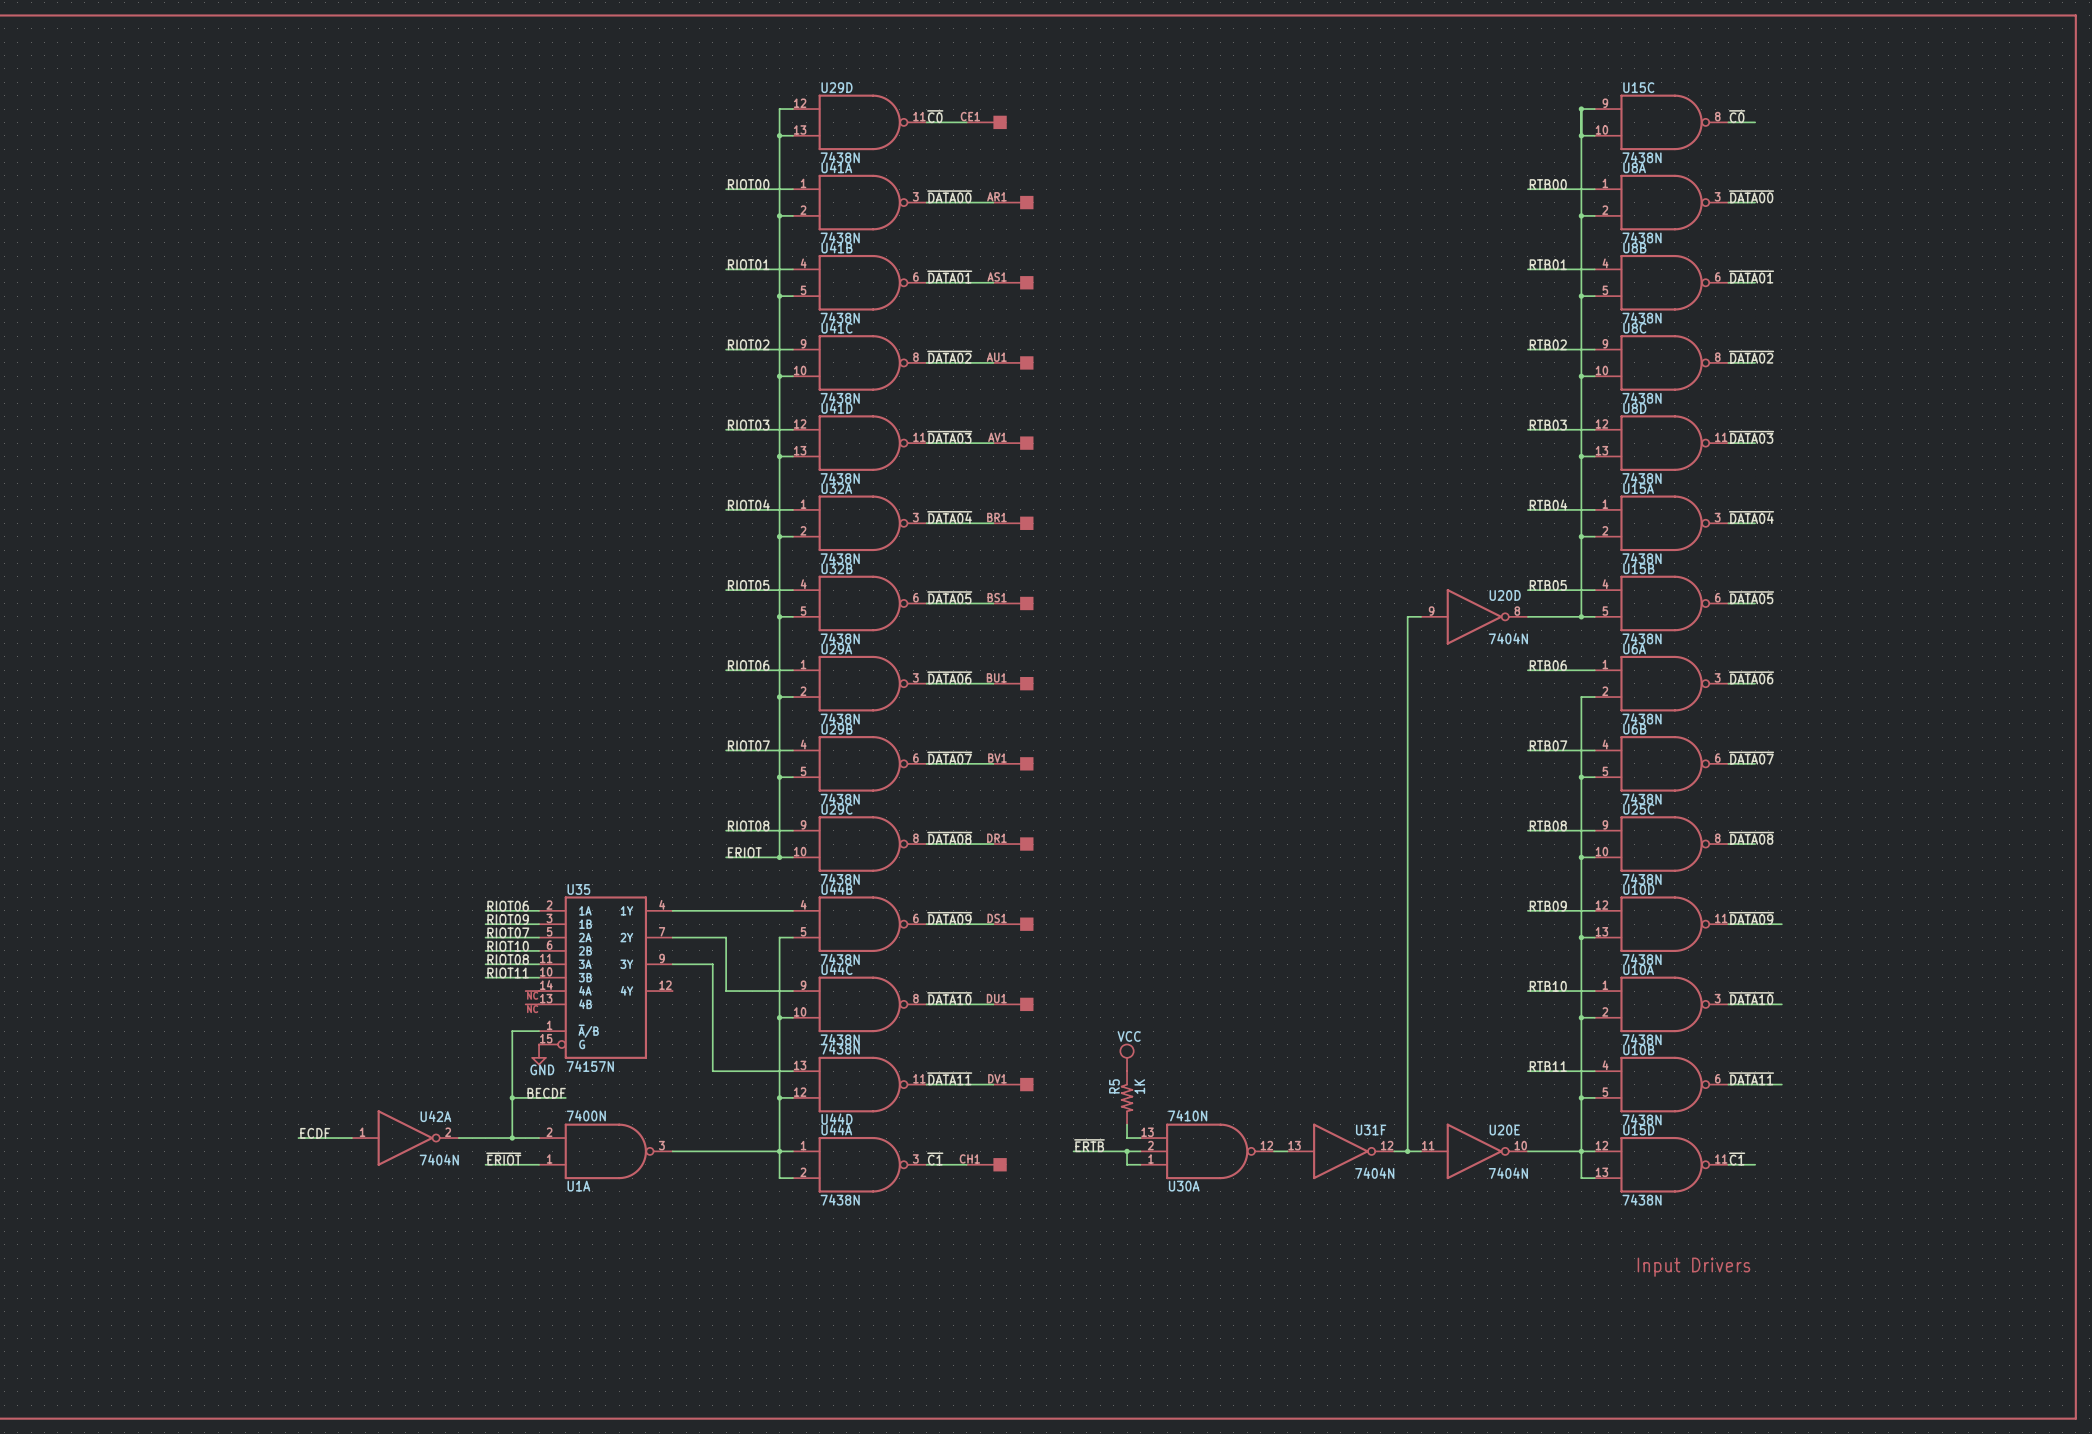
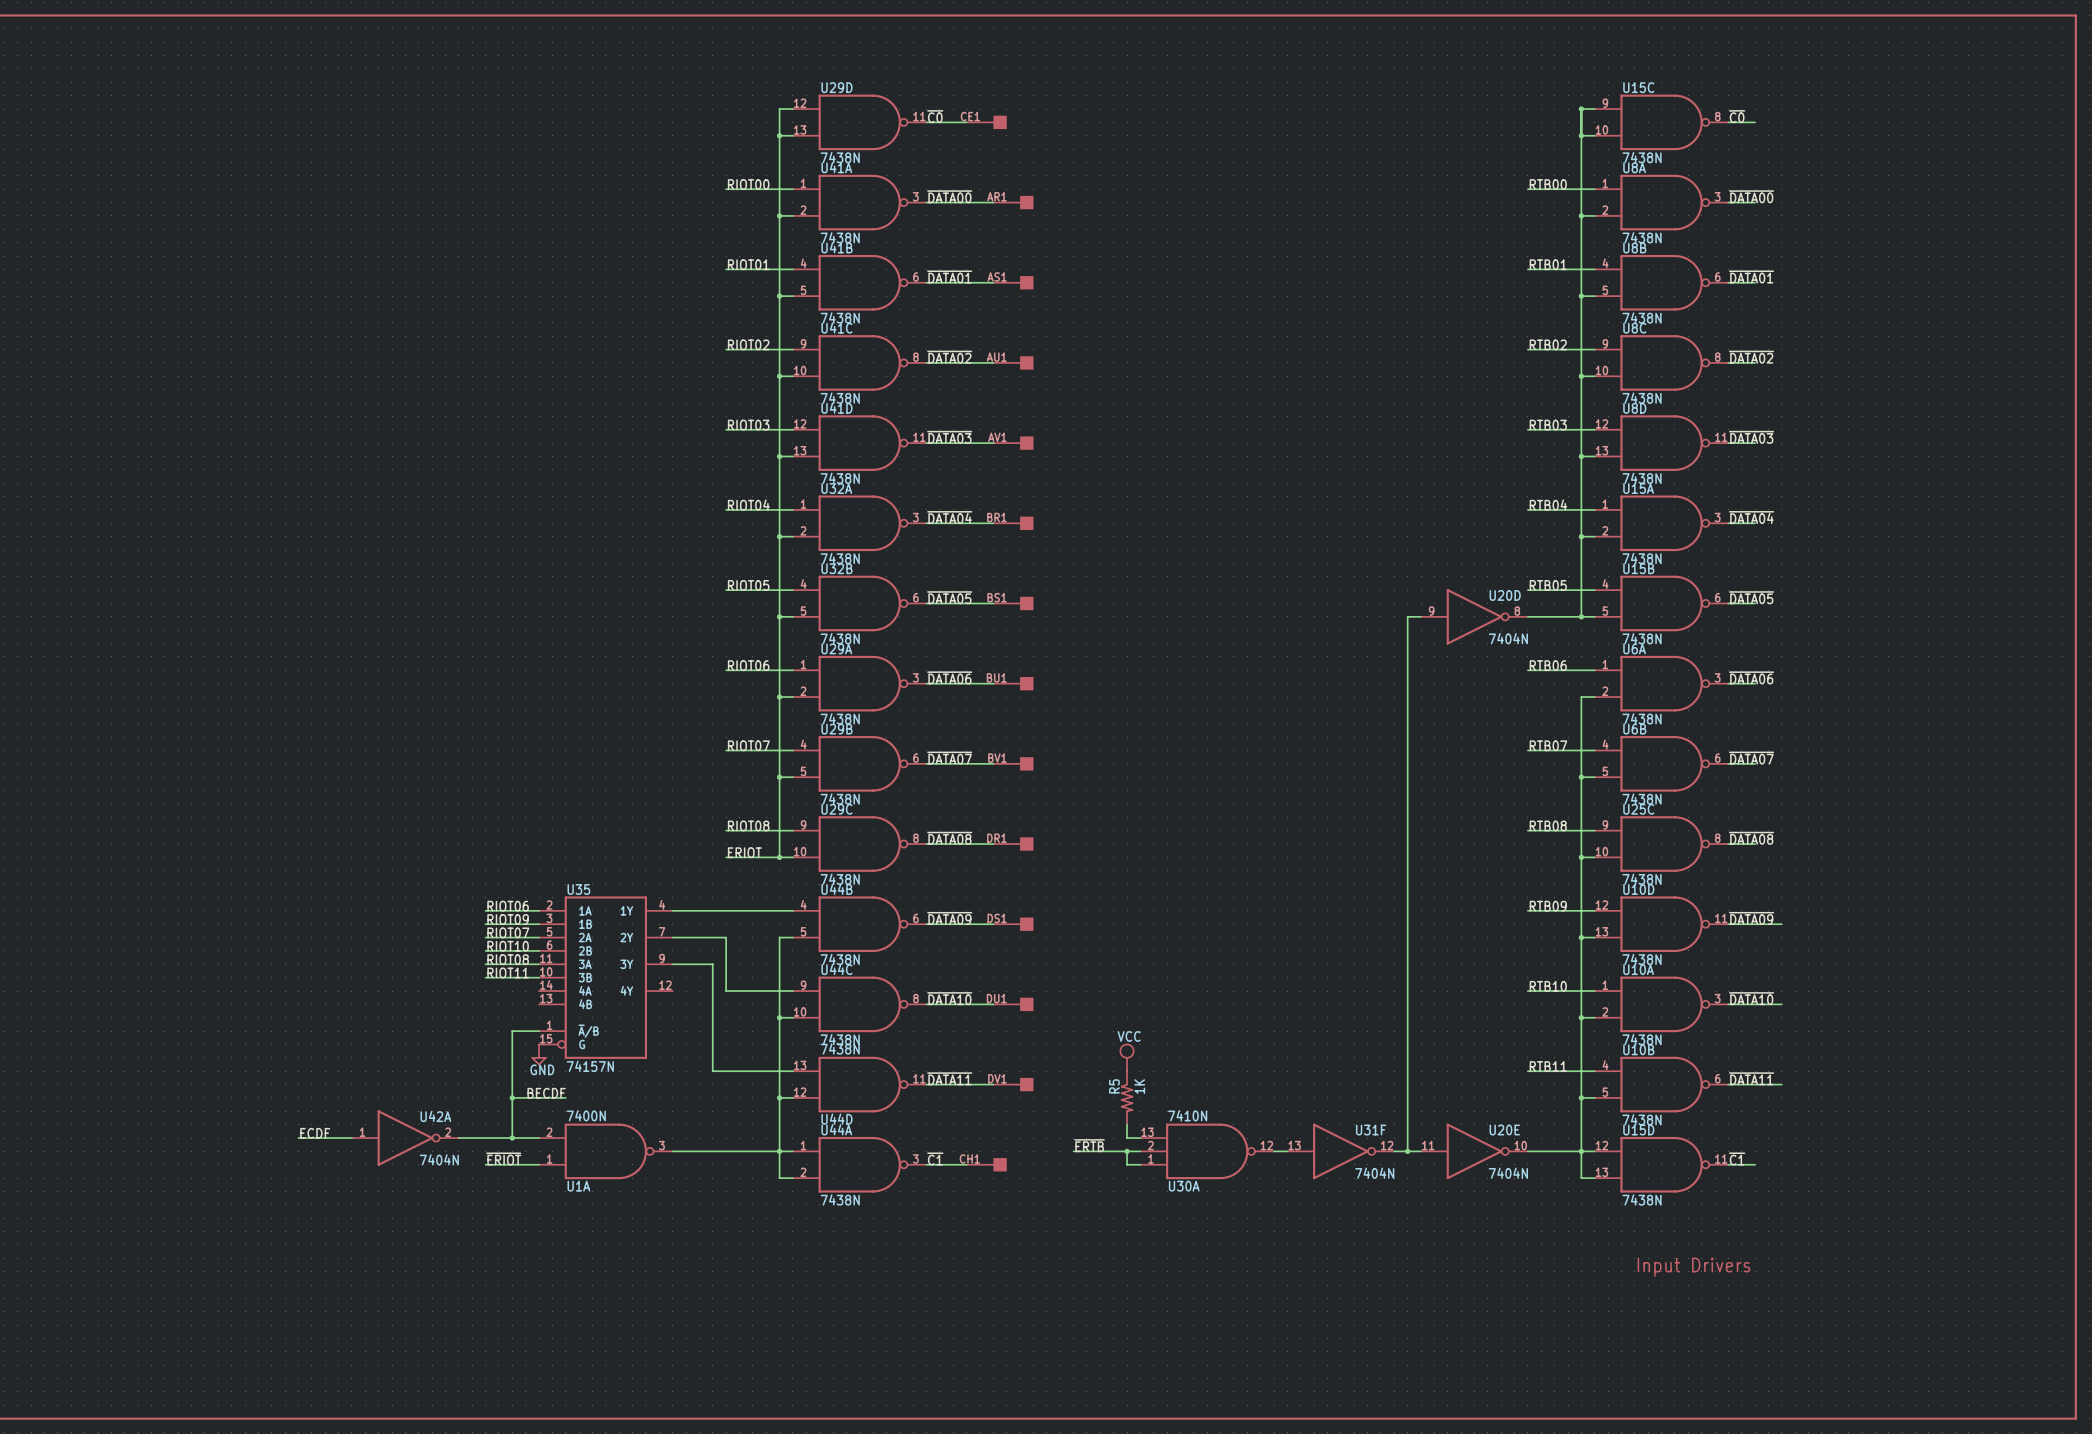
power symbol: (532, 991) -> none
power symbol: (532, 1004) -> none

